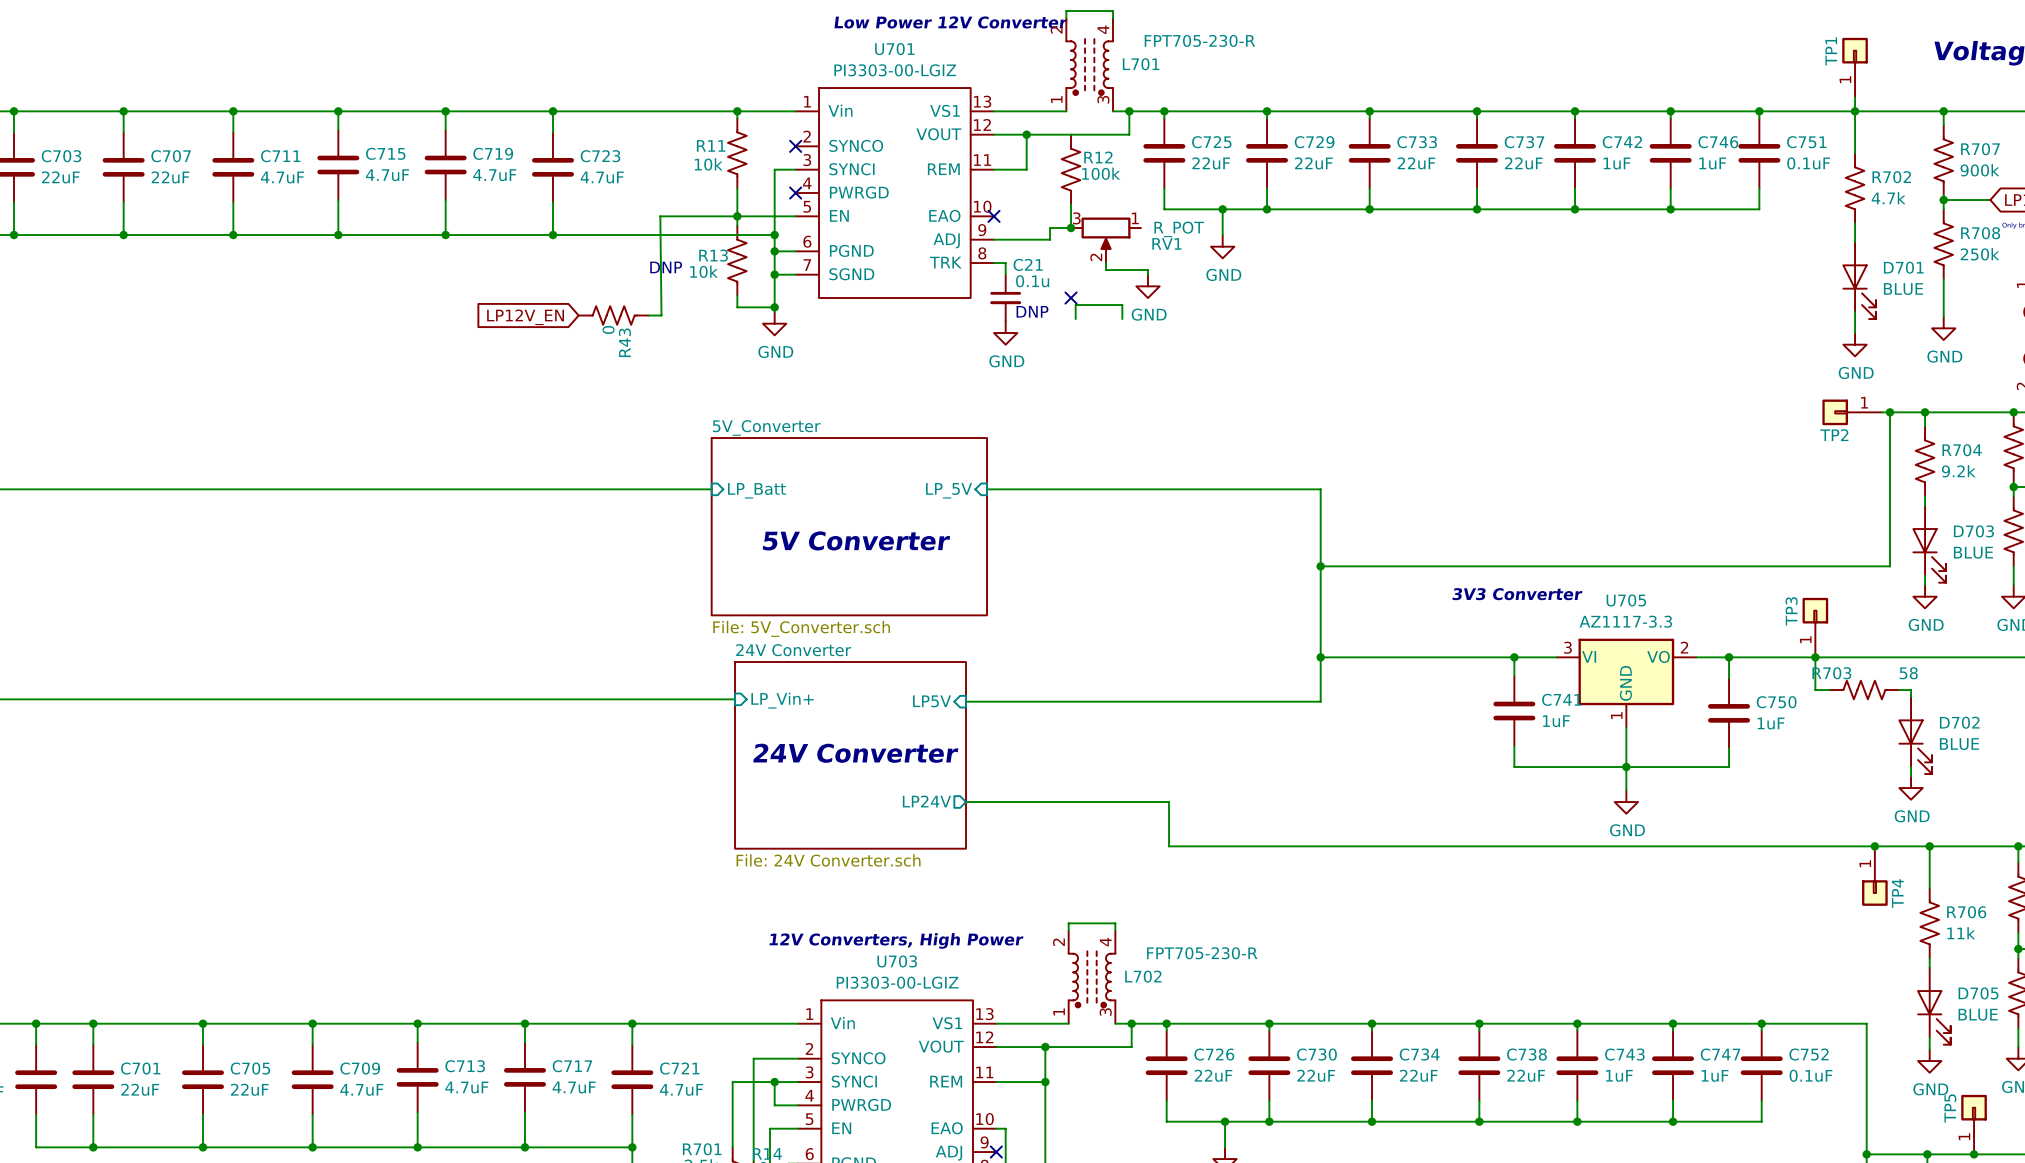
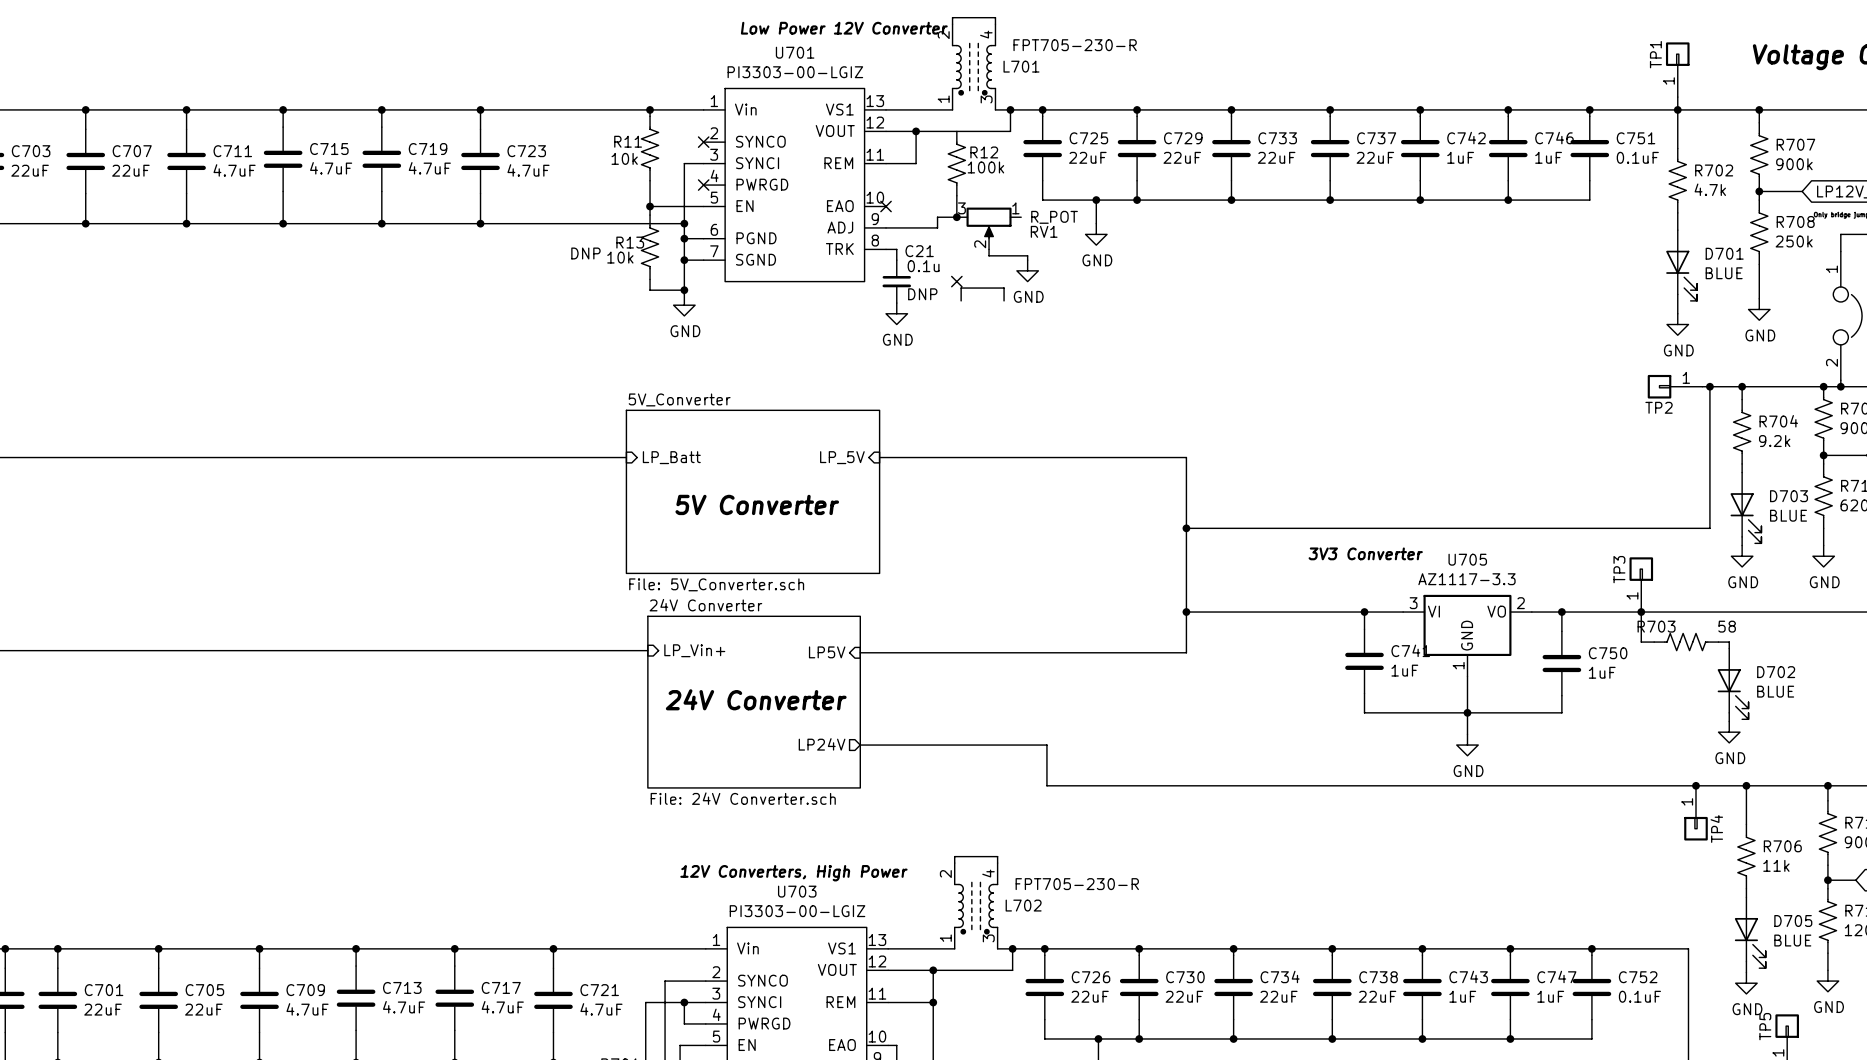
wire: (737, 216) (660, 216) (661, 315) (648, 315) -> none
R43: 0 (613, 315) -> none
global label: LP12V_EN (525, 317) -> none

